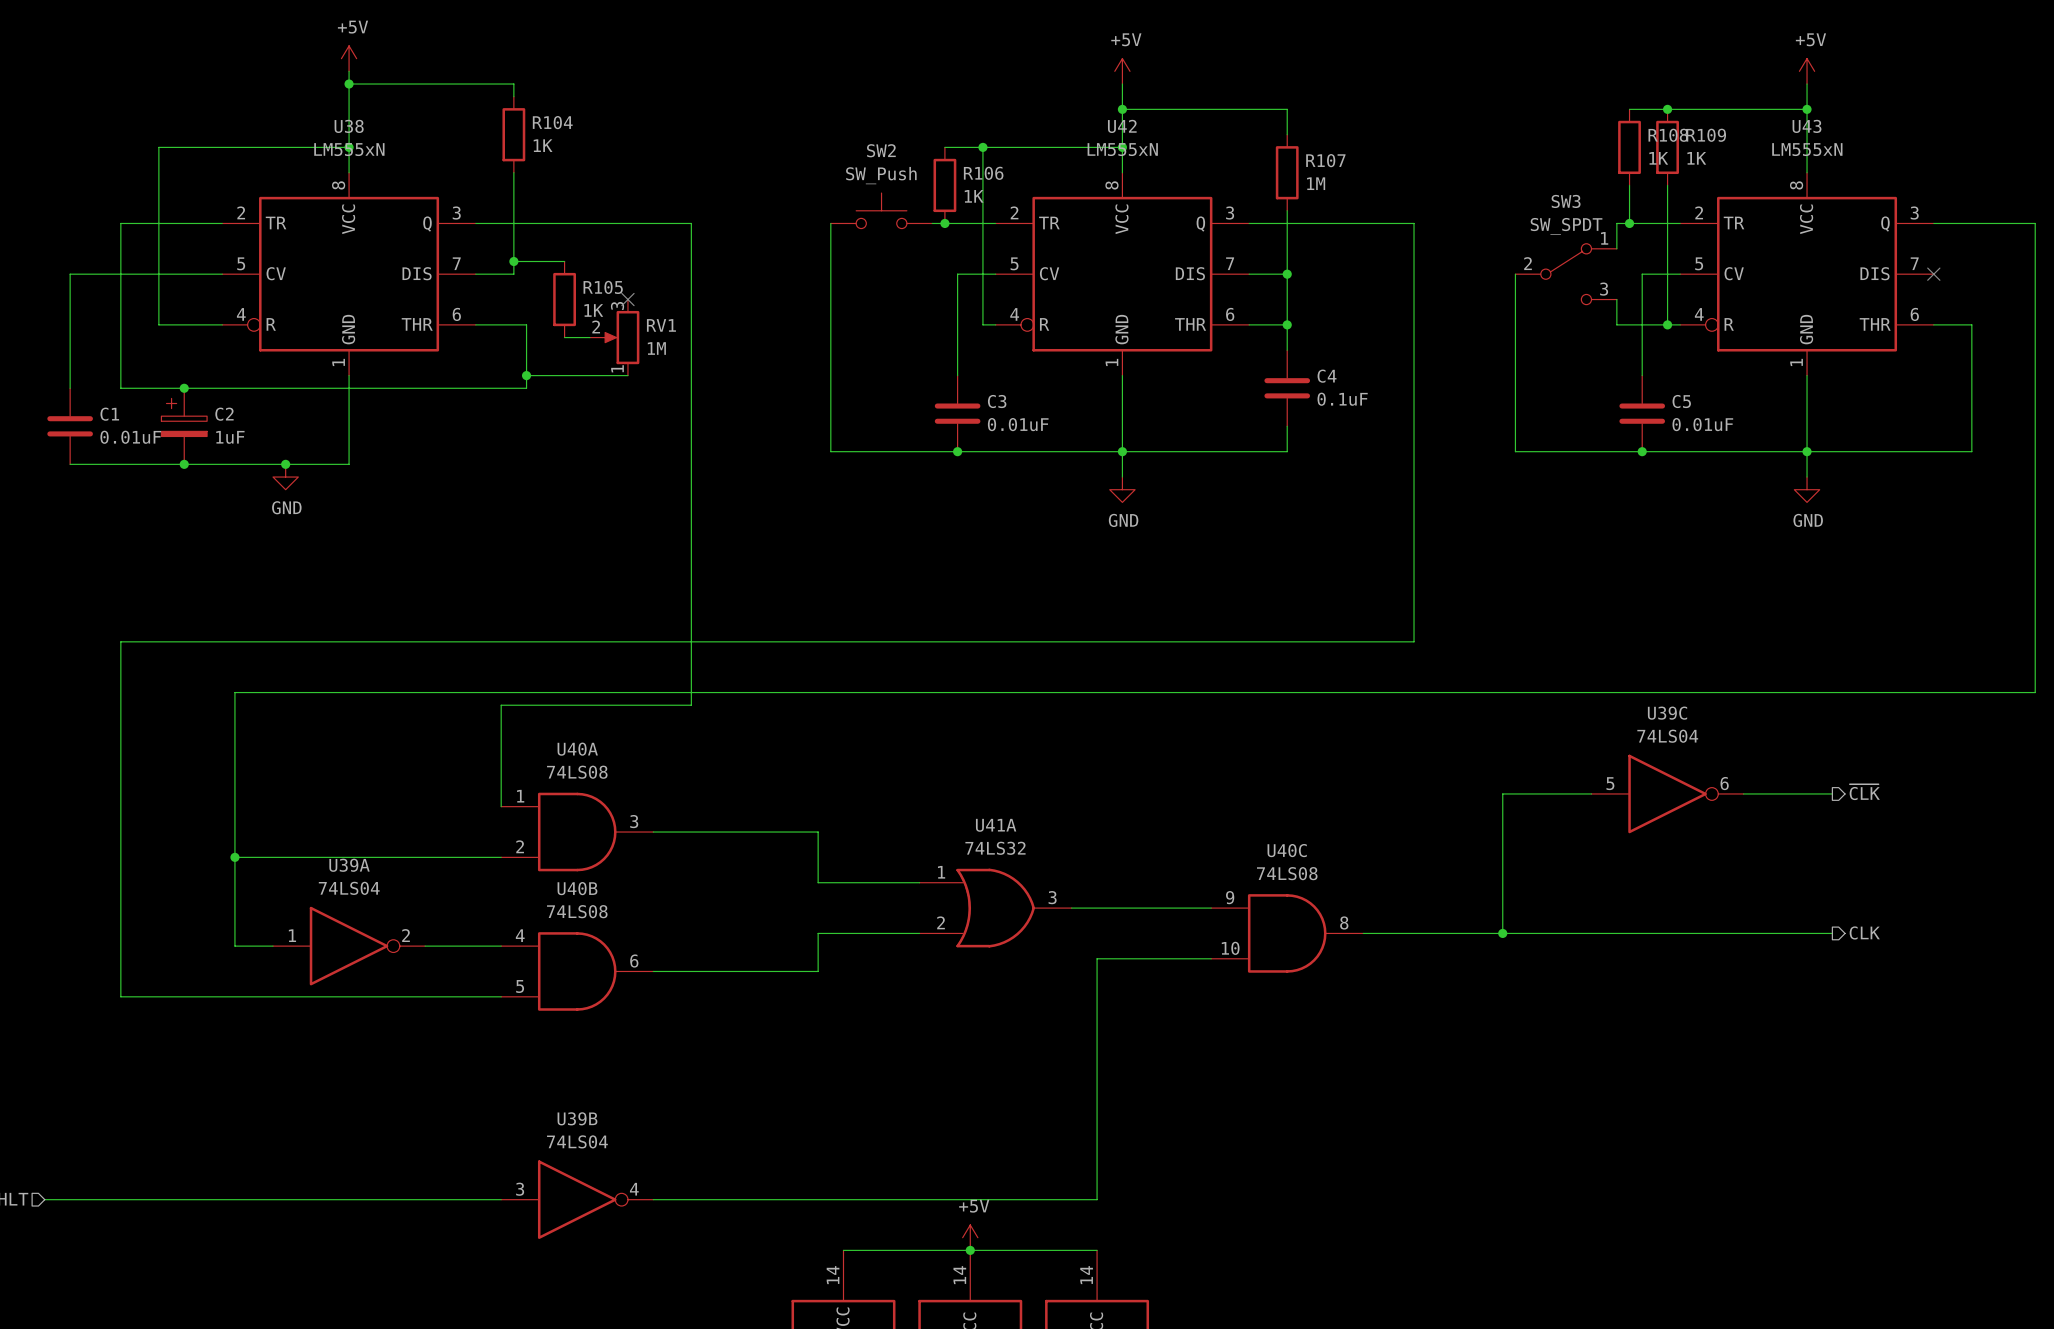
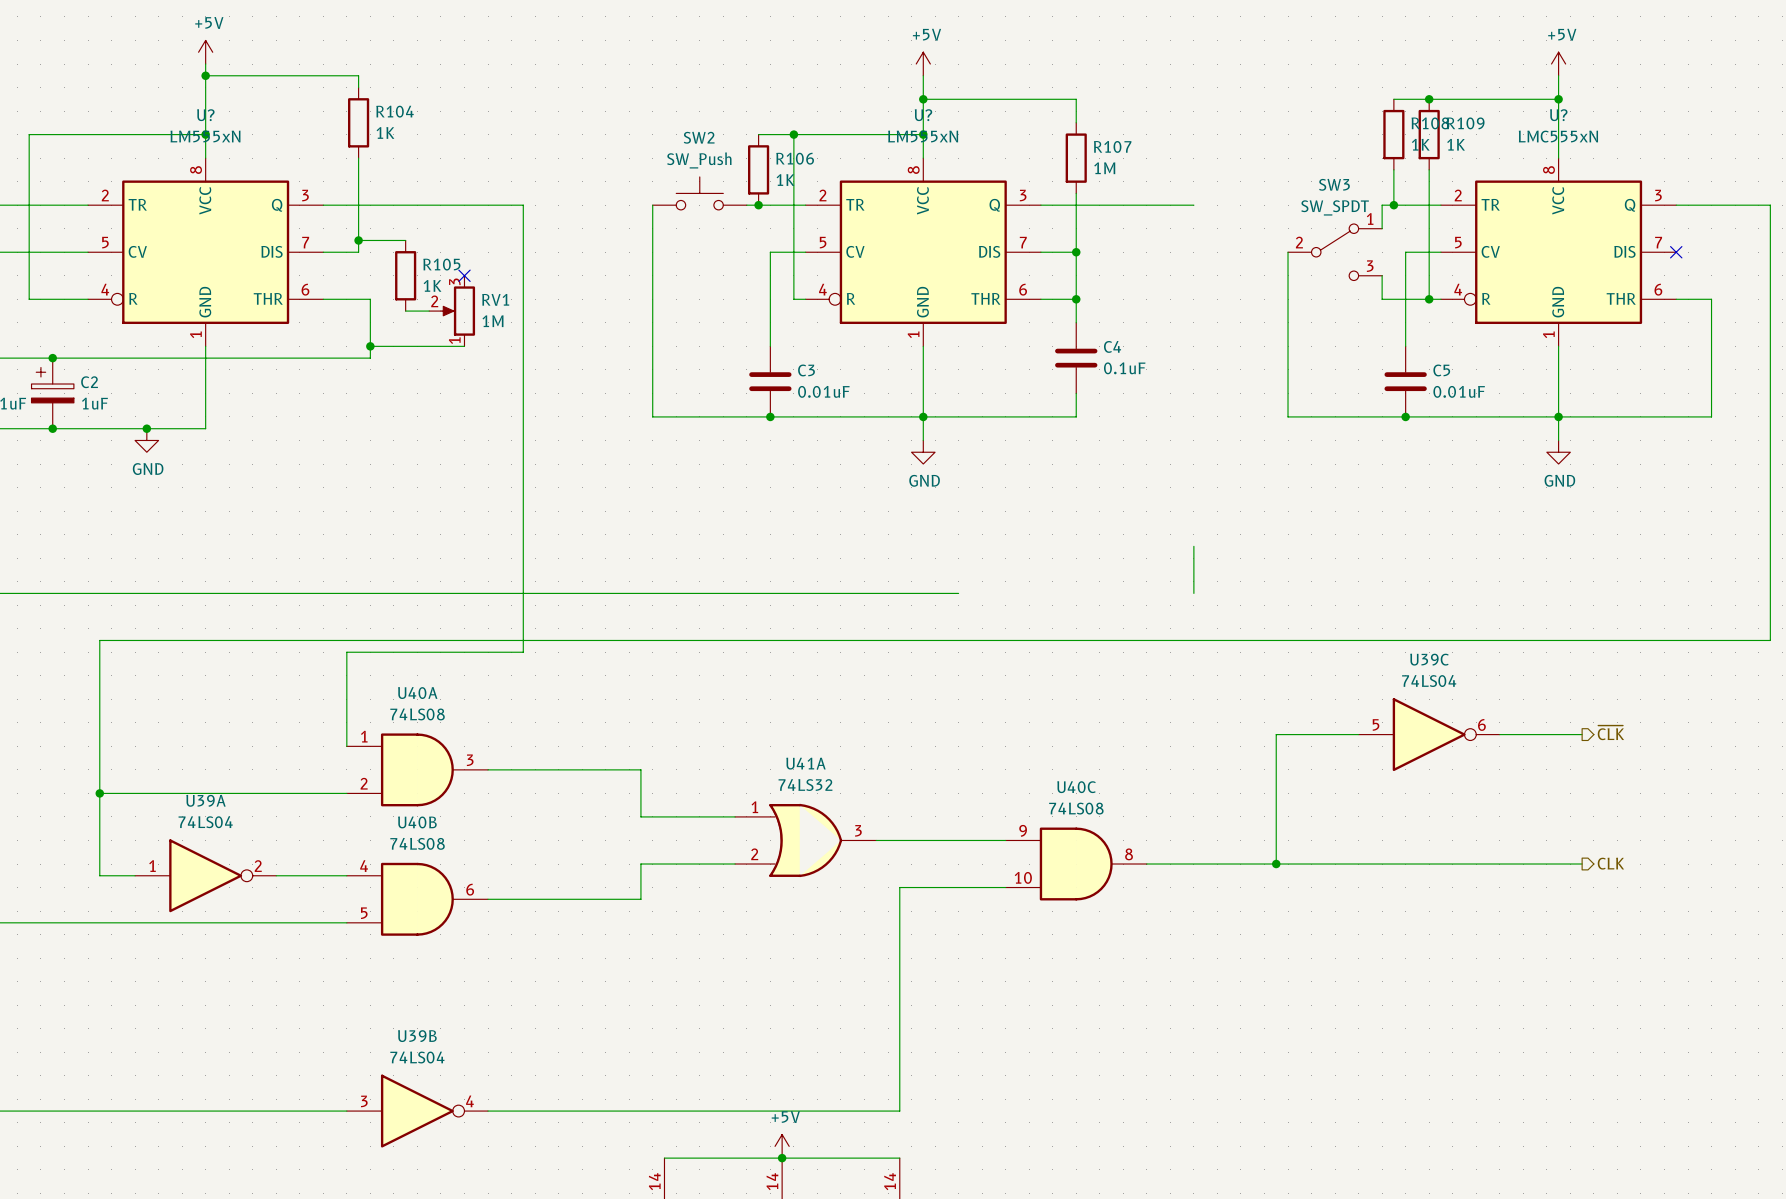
U38 name: U38 (349, 126) -> U? (205, 115)
U42 name: U42 (1122, 126) -> U? (923, 115)
U43 name: U43 (1806, 126) -> U? (1558, 115)
U43 value: LM555xN (1807, 149) -> LMC555xN (1558, 136)
wire: (1414, 223) (1414, 591) -> none
wire: (1160, 641) (1414, 641) -> none

